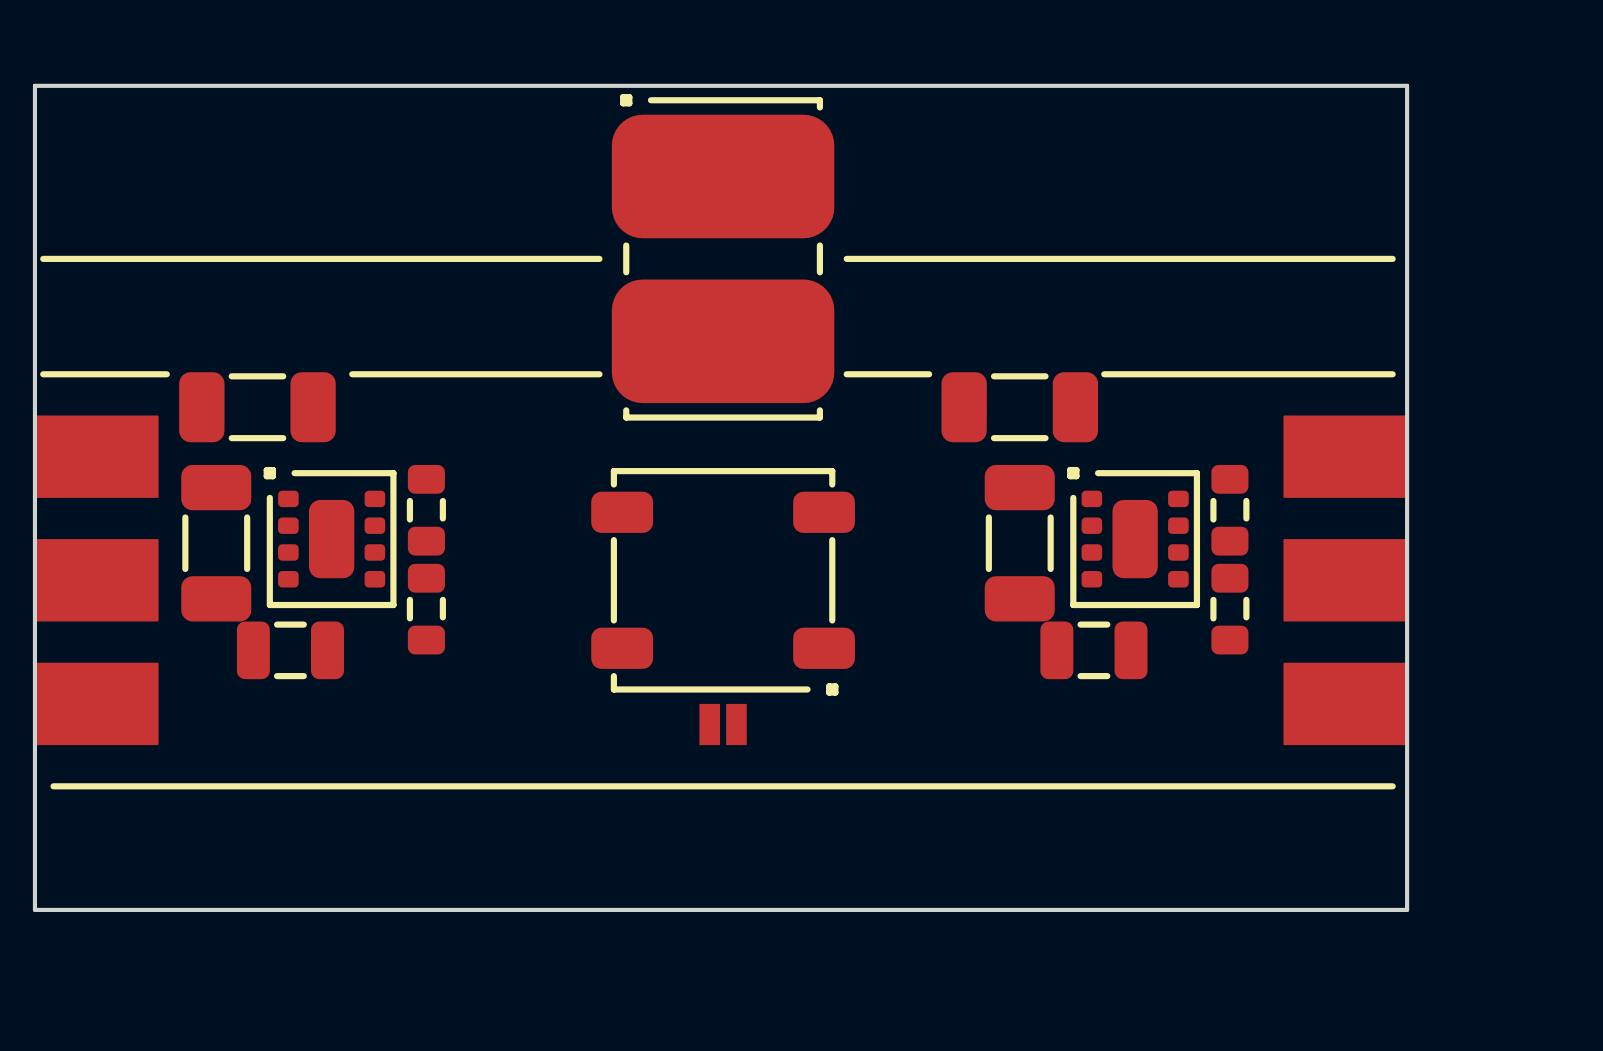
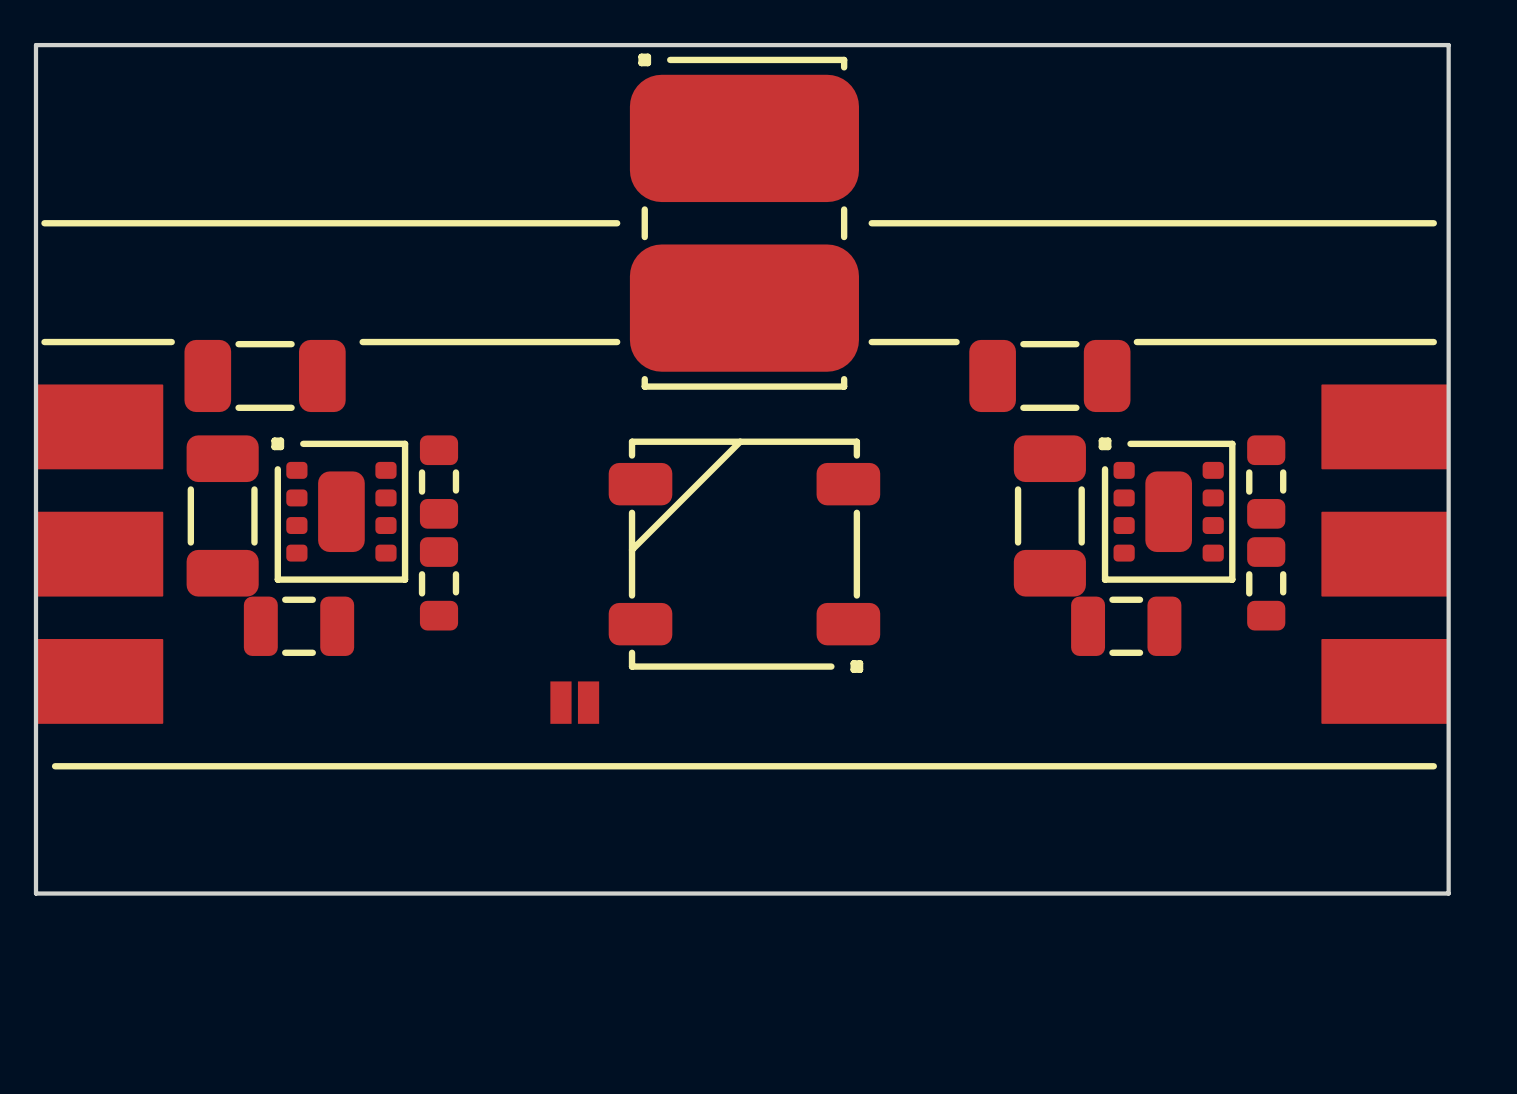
part footprint: [591, 468, 855, 696] -> [608, 438, 881, 673]
part position: (723, 724) -> (574, 702)

